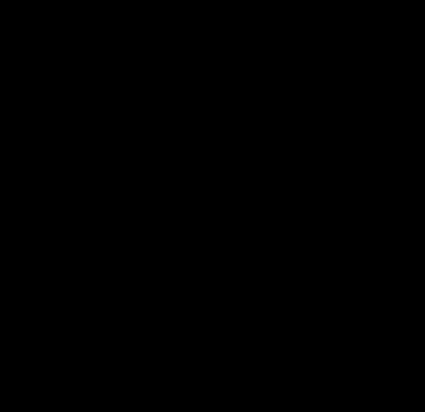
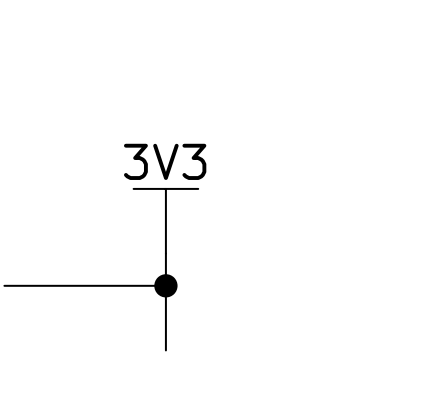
power symbol: none -> 3V3 (165, 221)
wire: none -> (165, 253) (165, 350)
wire: none -> (4, 285) (165, 285)
junction: none -> (165, 285)

